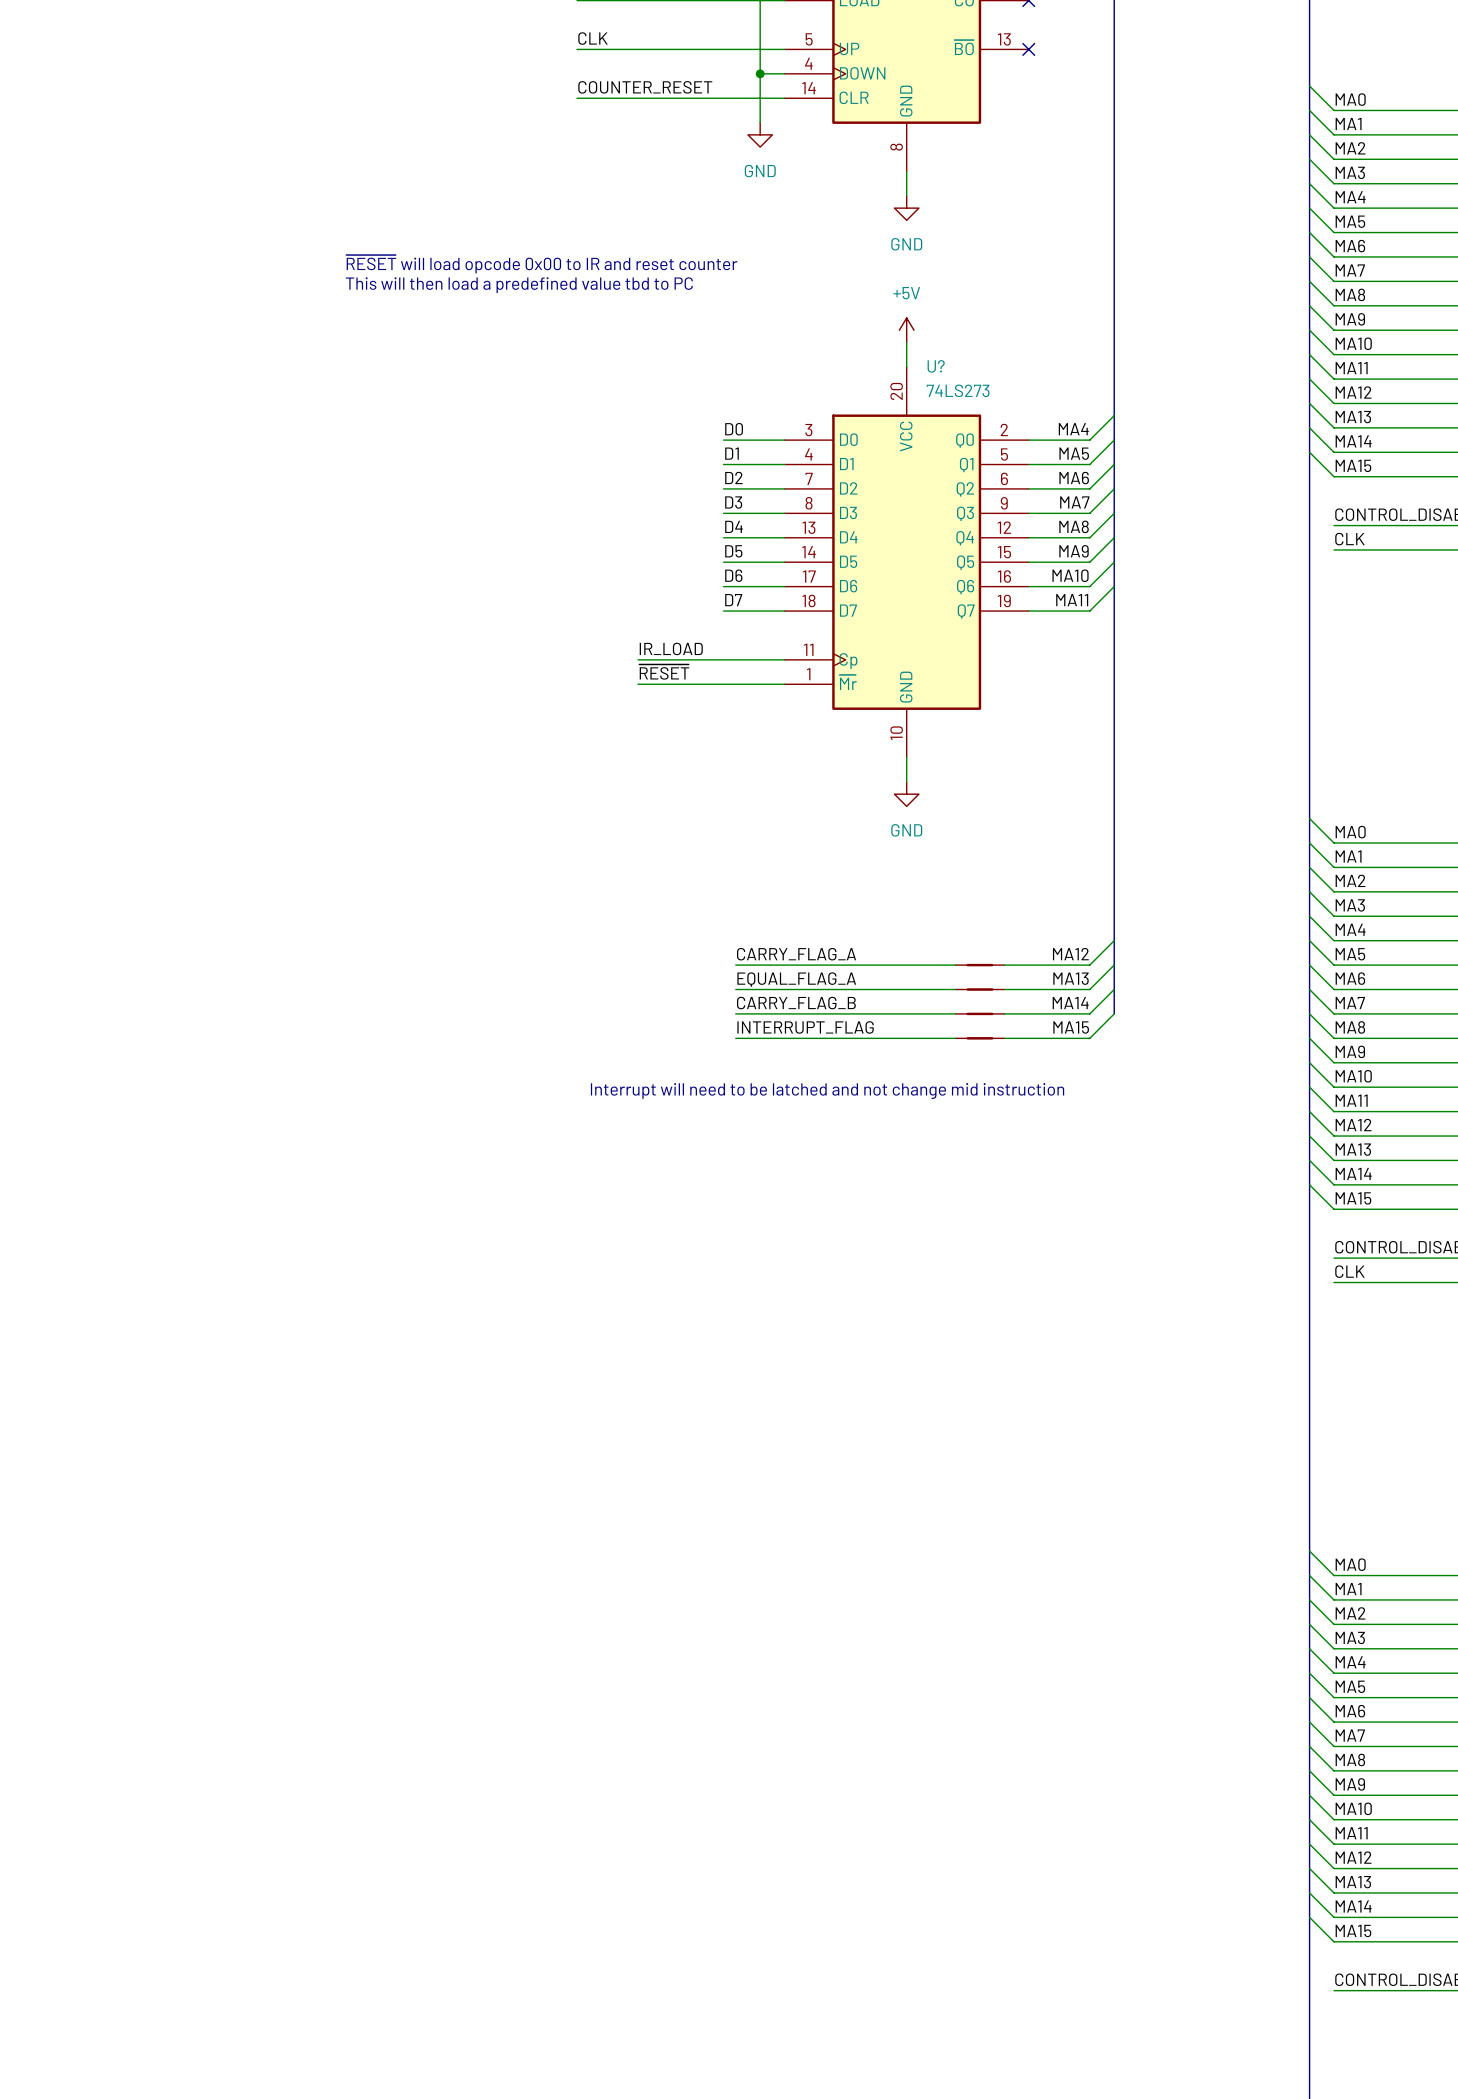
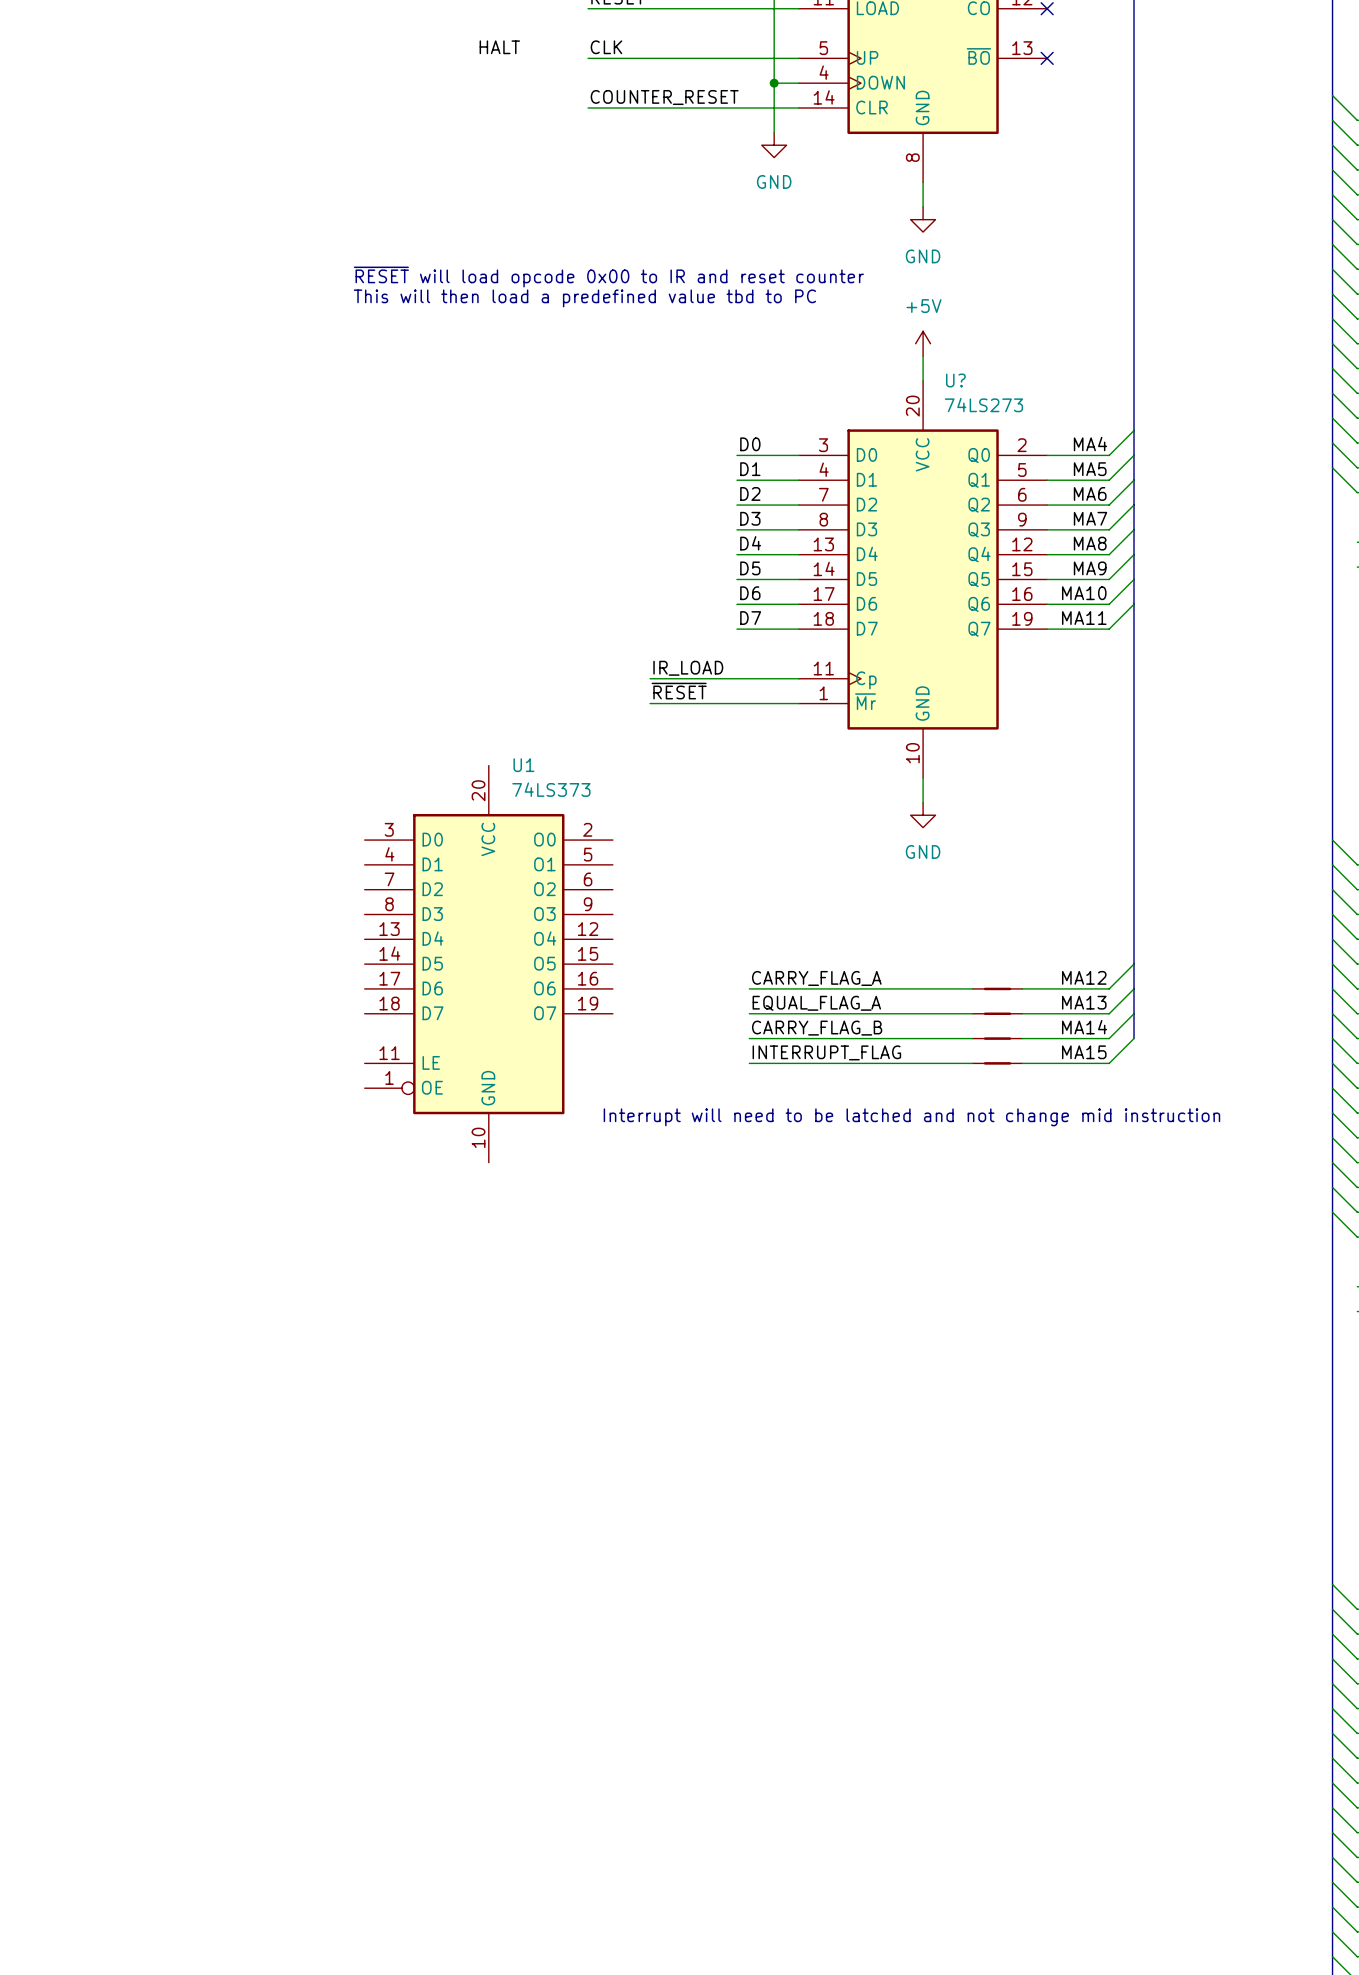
label: none -> HALT (499, 47)
U1: none -> 74LS373 (488, 964)

